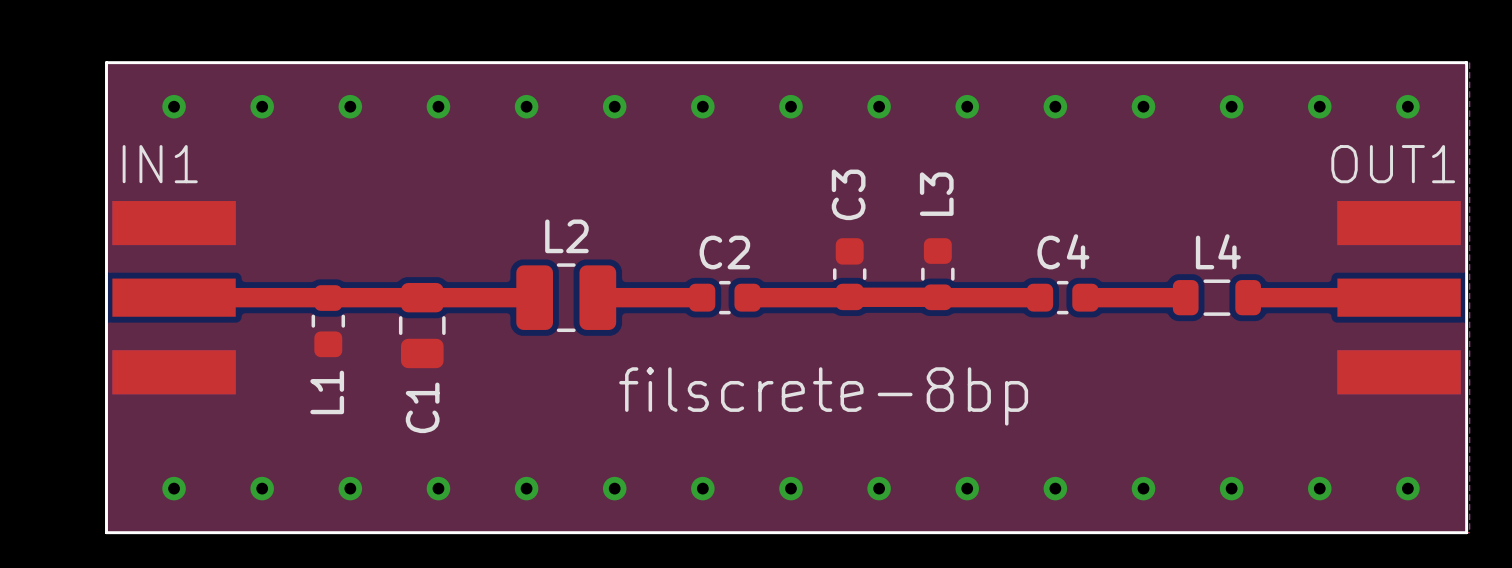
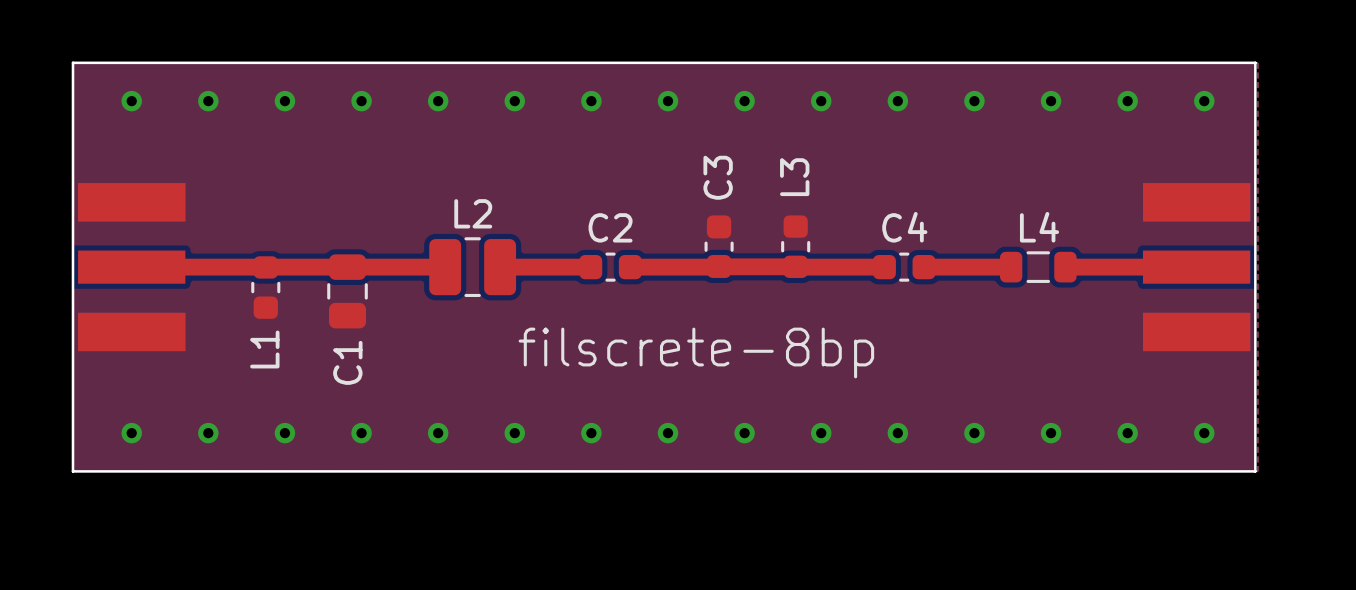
IN1 name: IN1 (160, 164) -> none
OUT1 name: OUT1 (1393, 164) -> none

